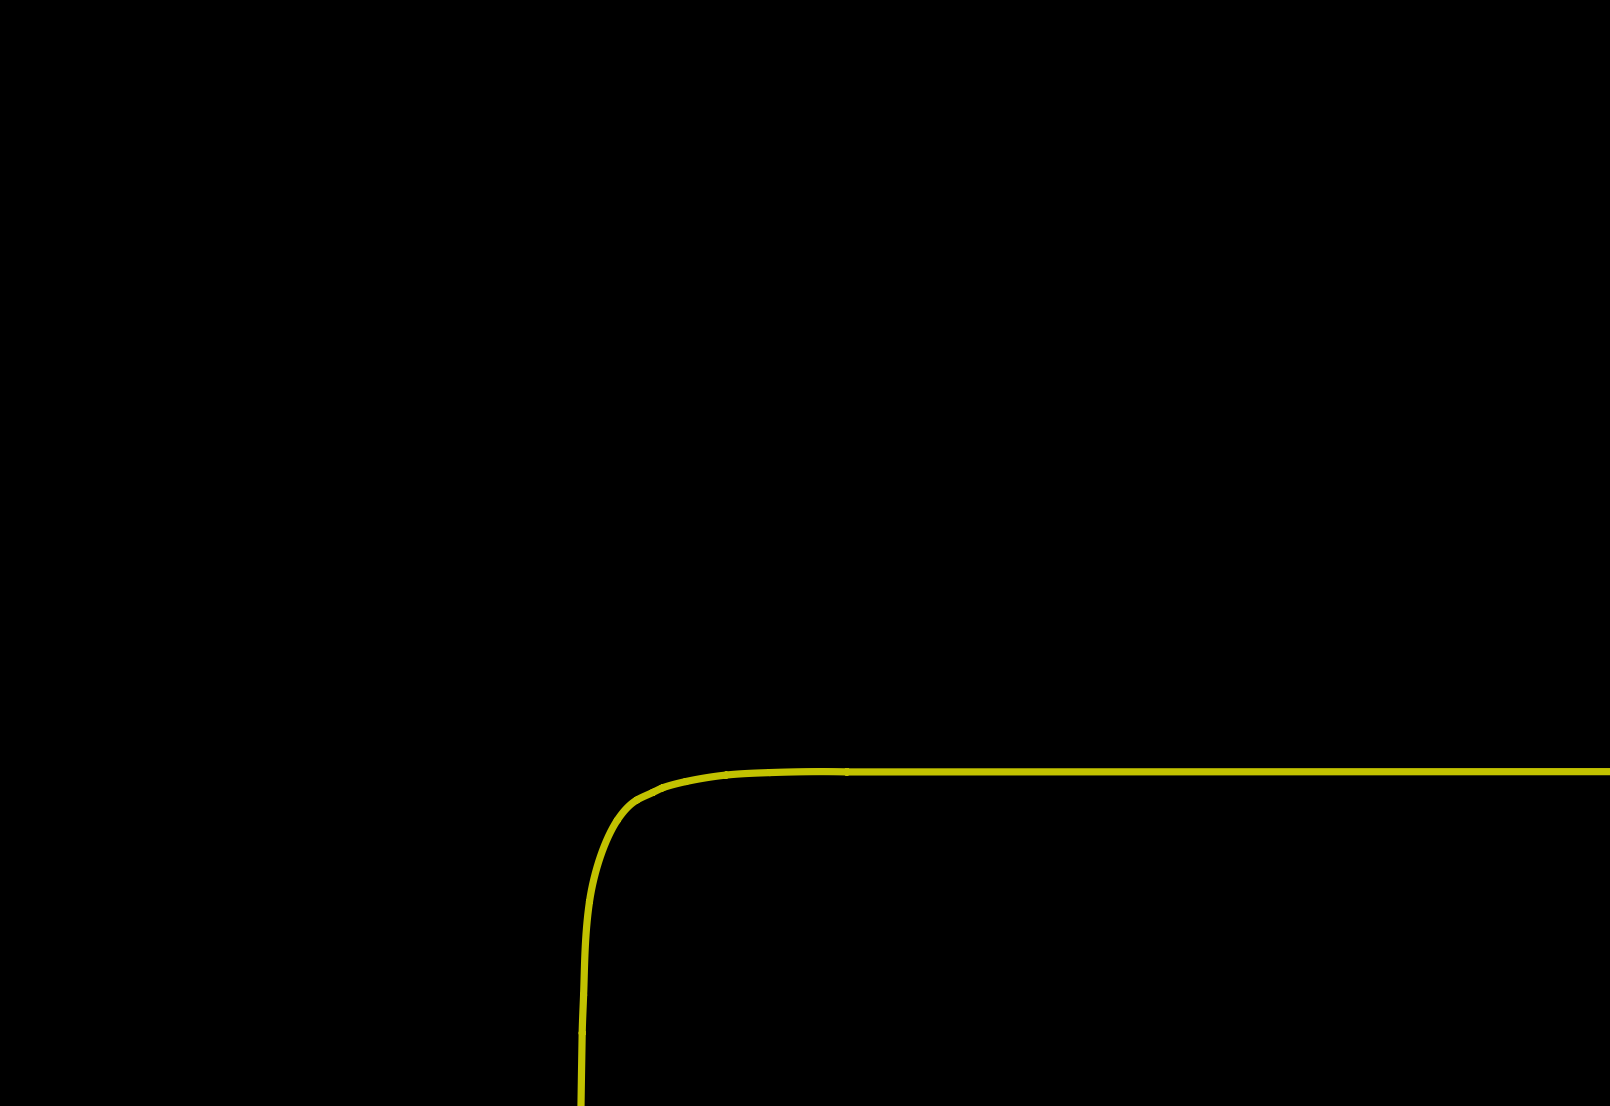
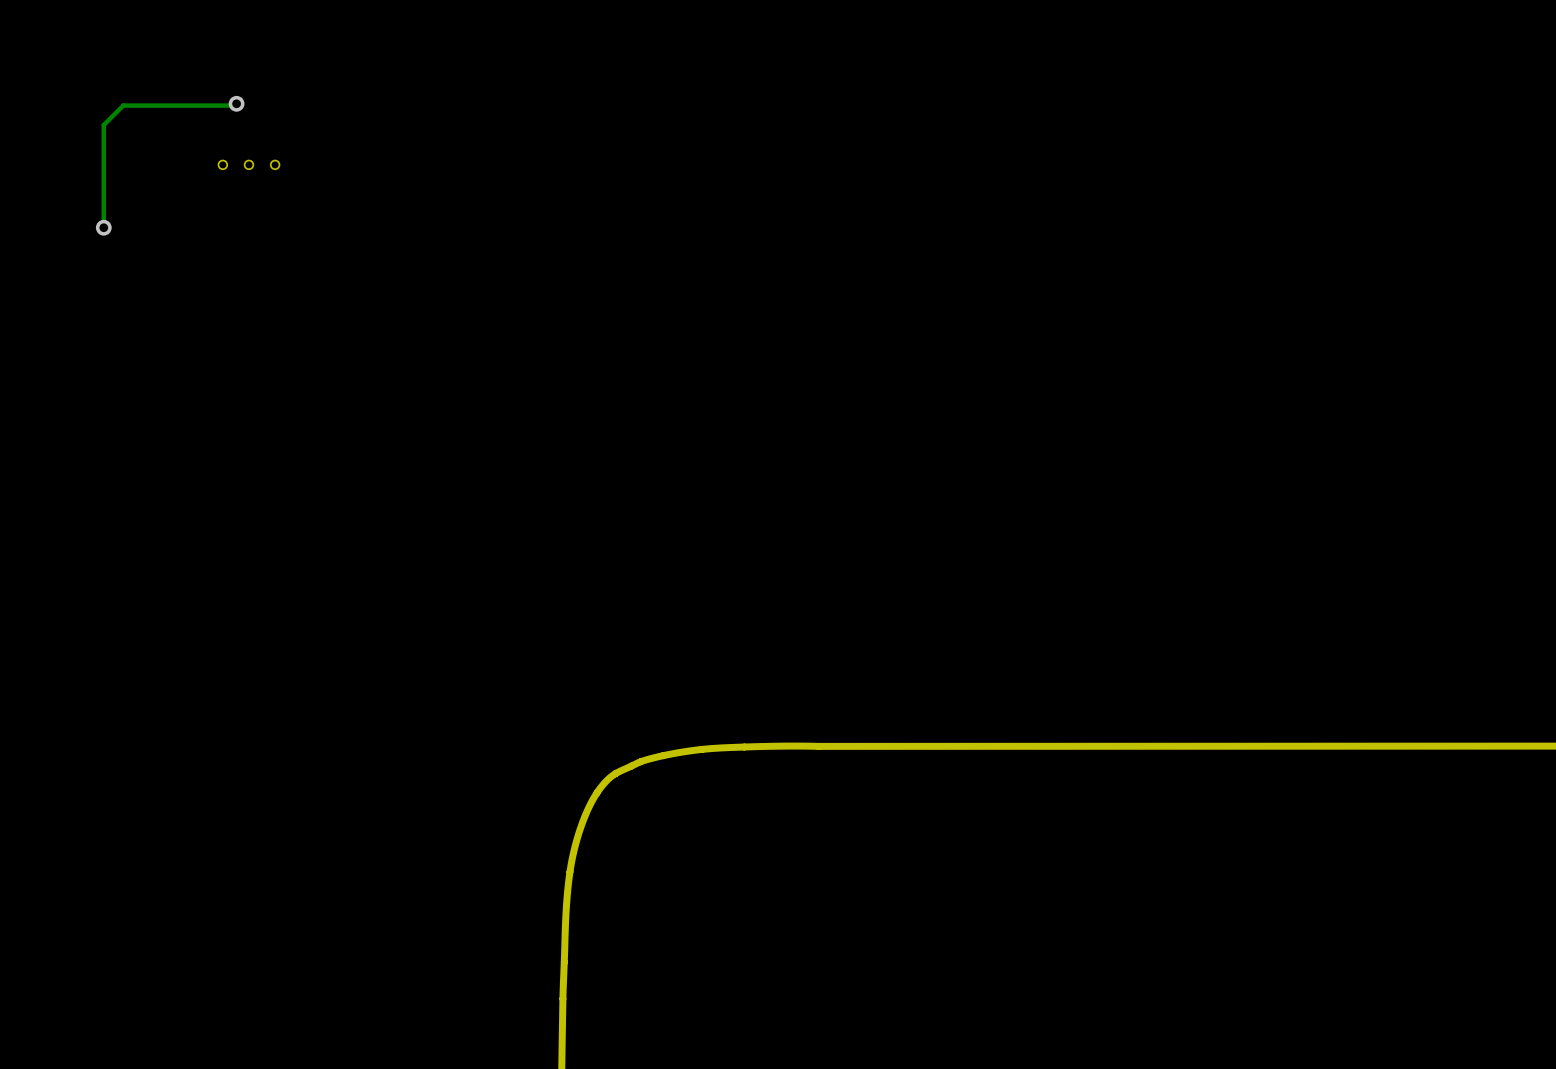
track: none -> (236, 103) (234, 105) (123, 105) (103, 125) (103, 227)
via: none -> (236, 103)
part: none -> (248, 164)
via: none -> (103, 227)

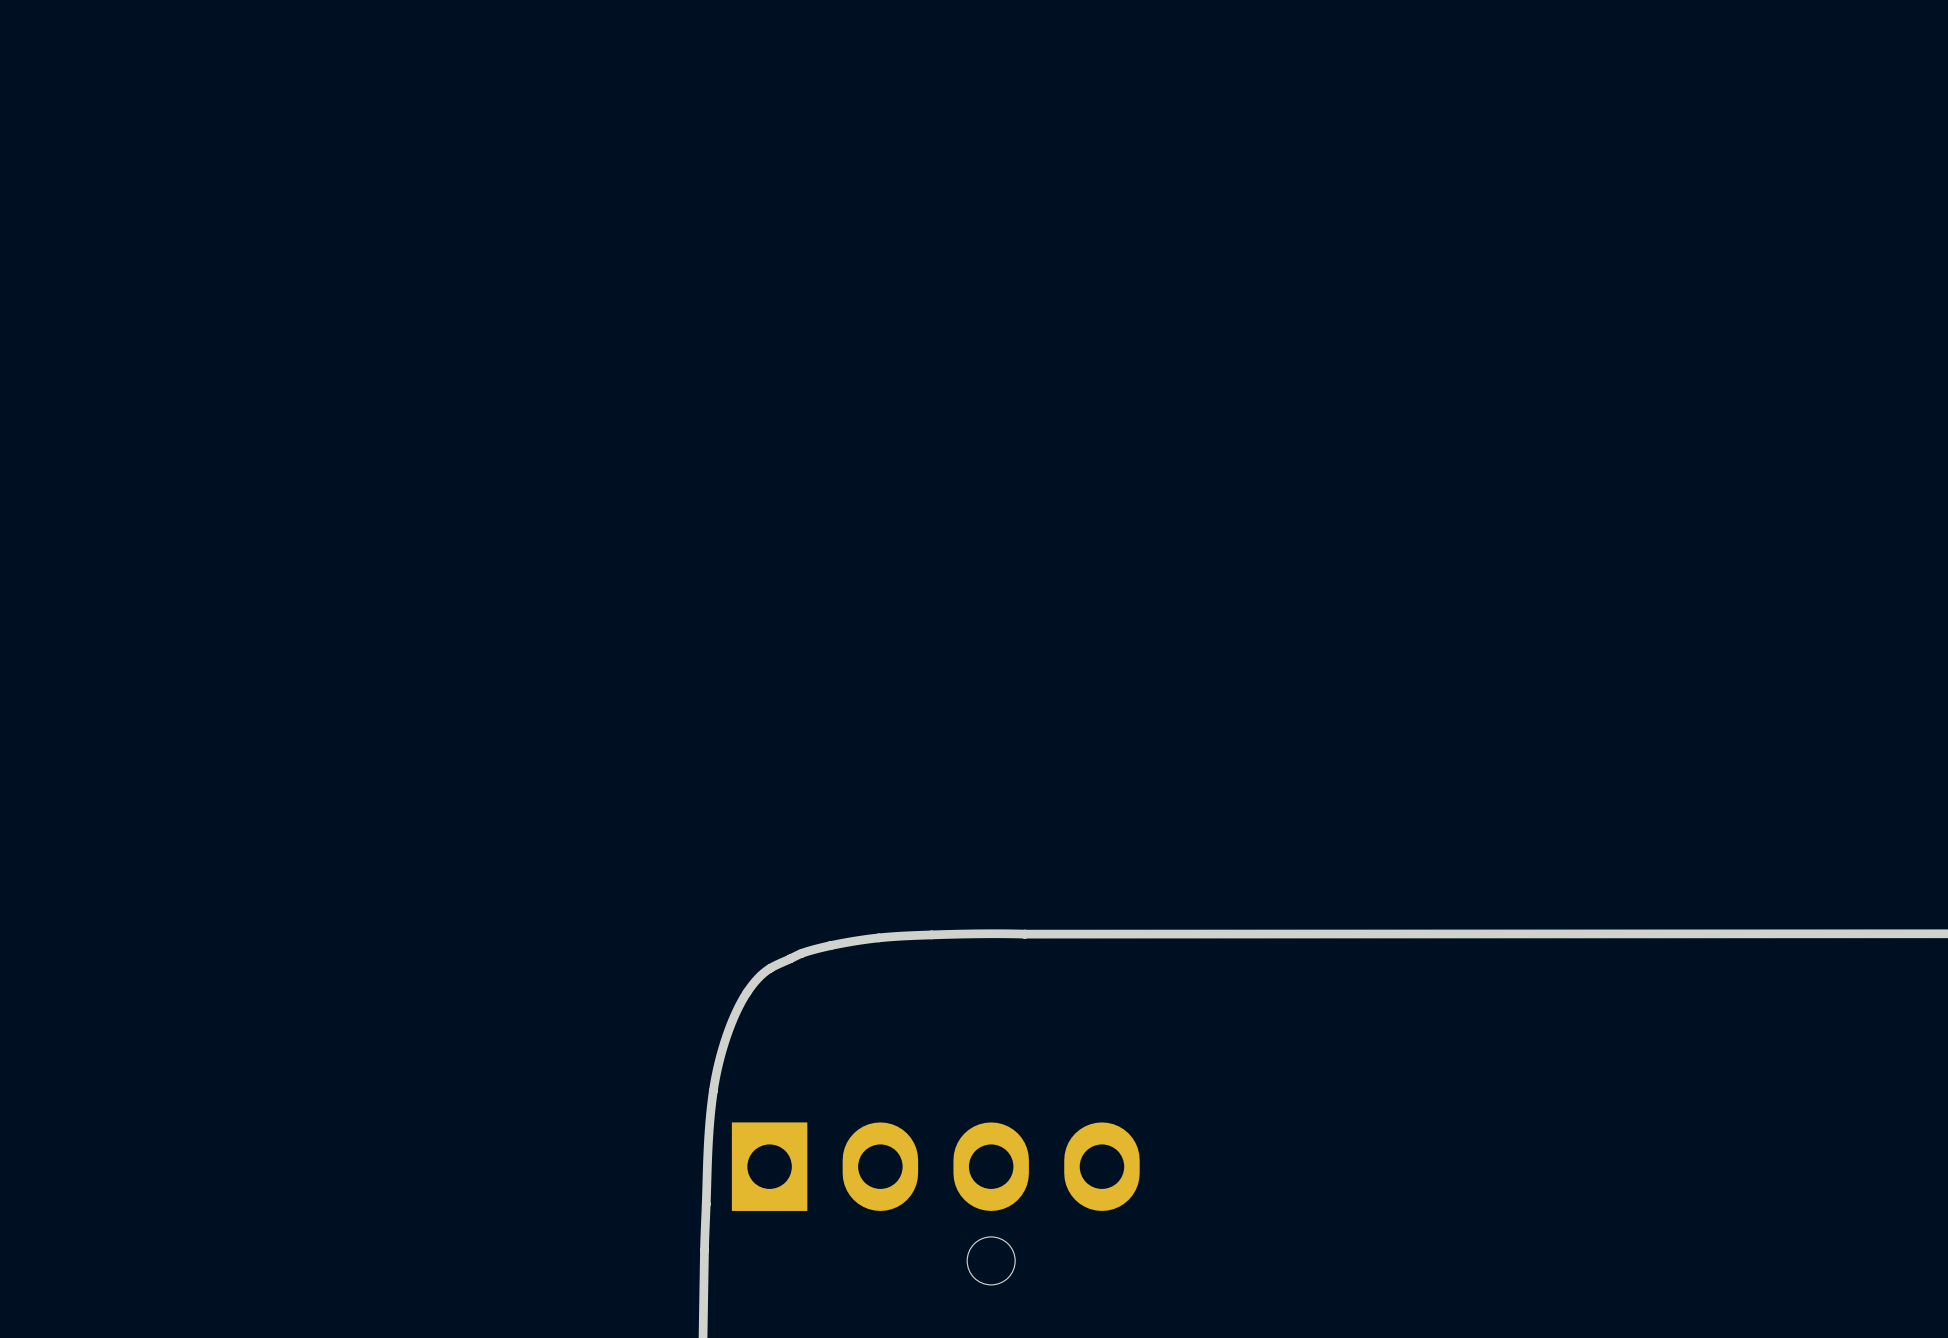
track: (236, 103) (234, 105) (123, 105) (103, 125) (103, 227) -> none
via: (236, 103) -> none
part: (248, 164) -> none
via: (103, 227) -> none
part: none -> (935, 1203)

